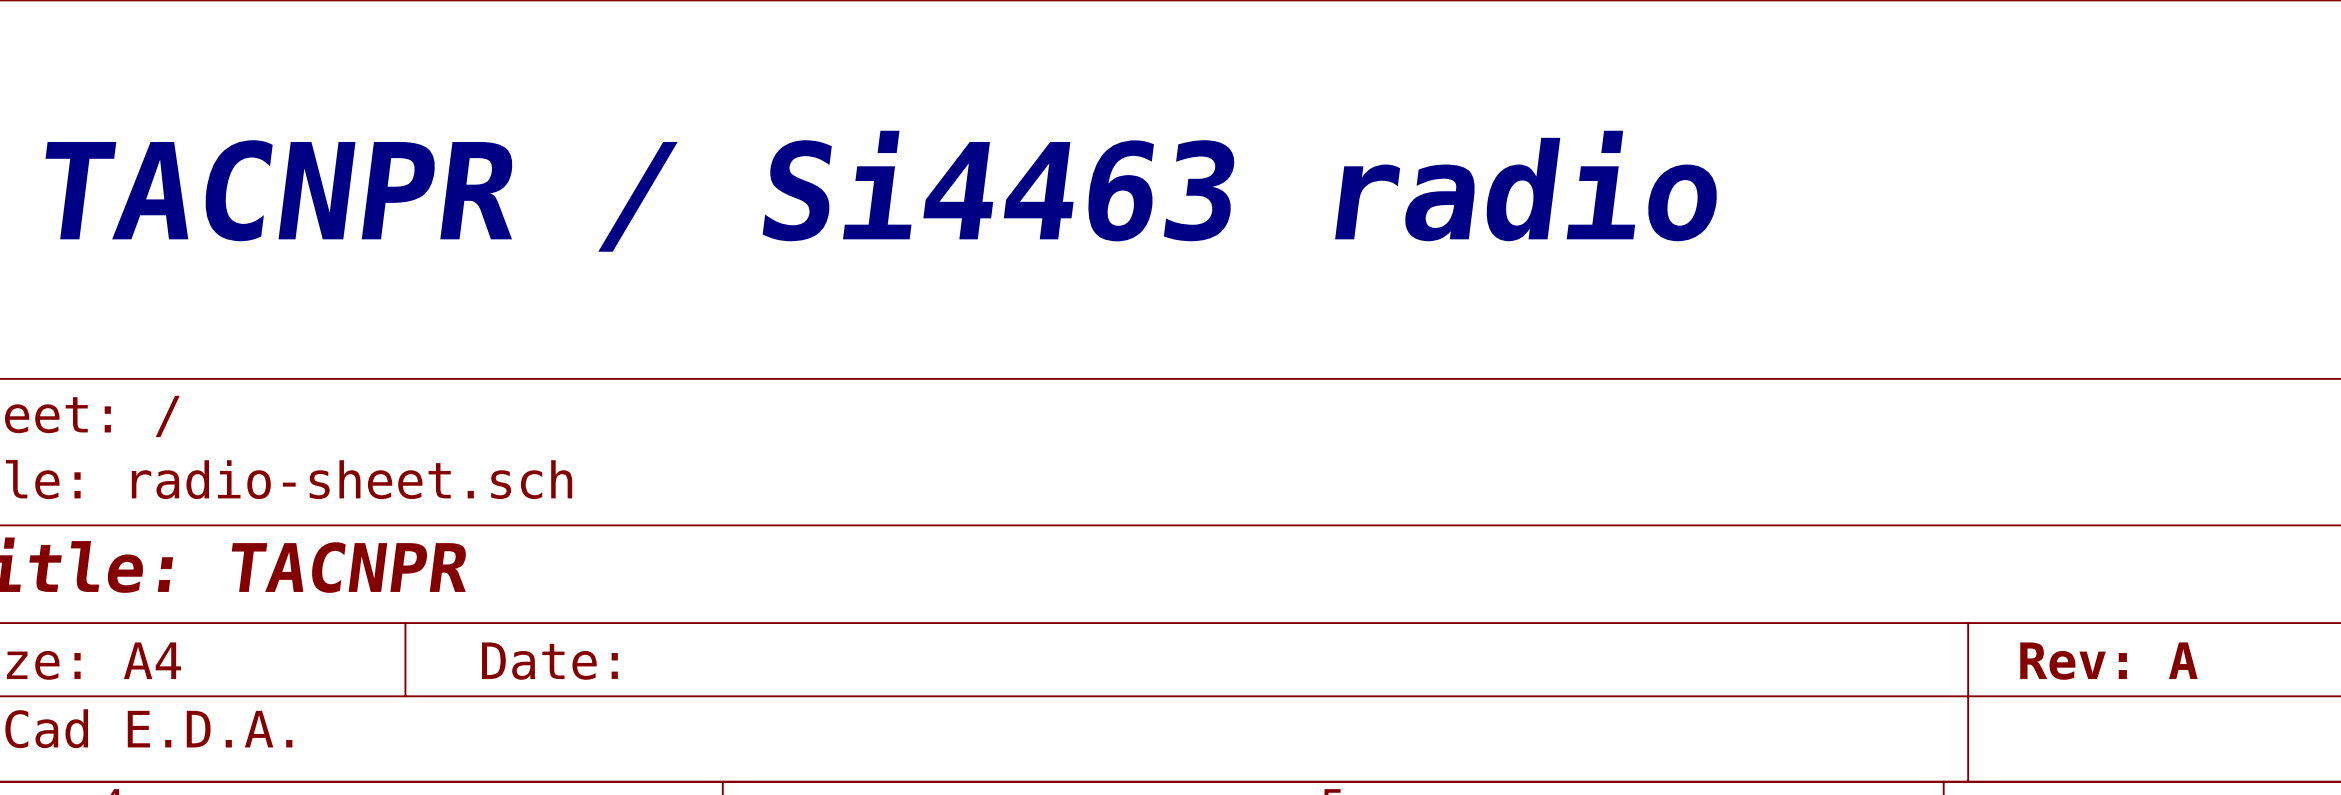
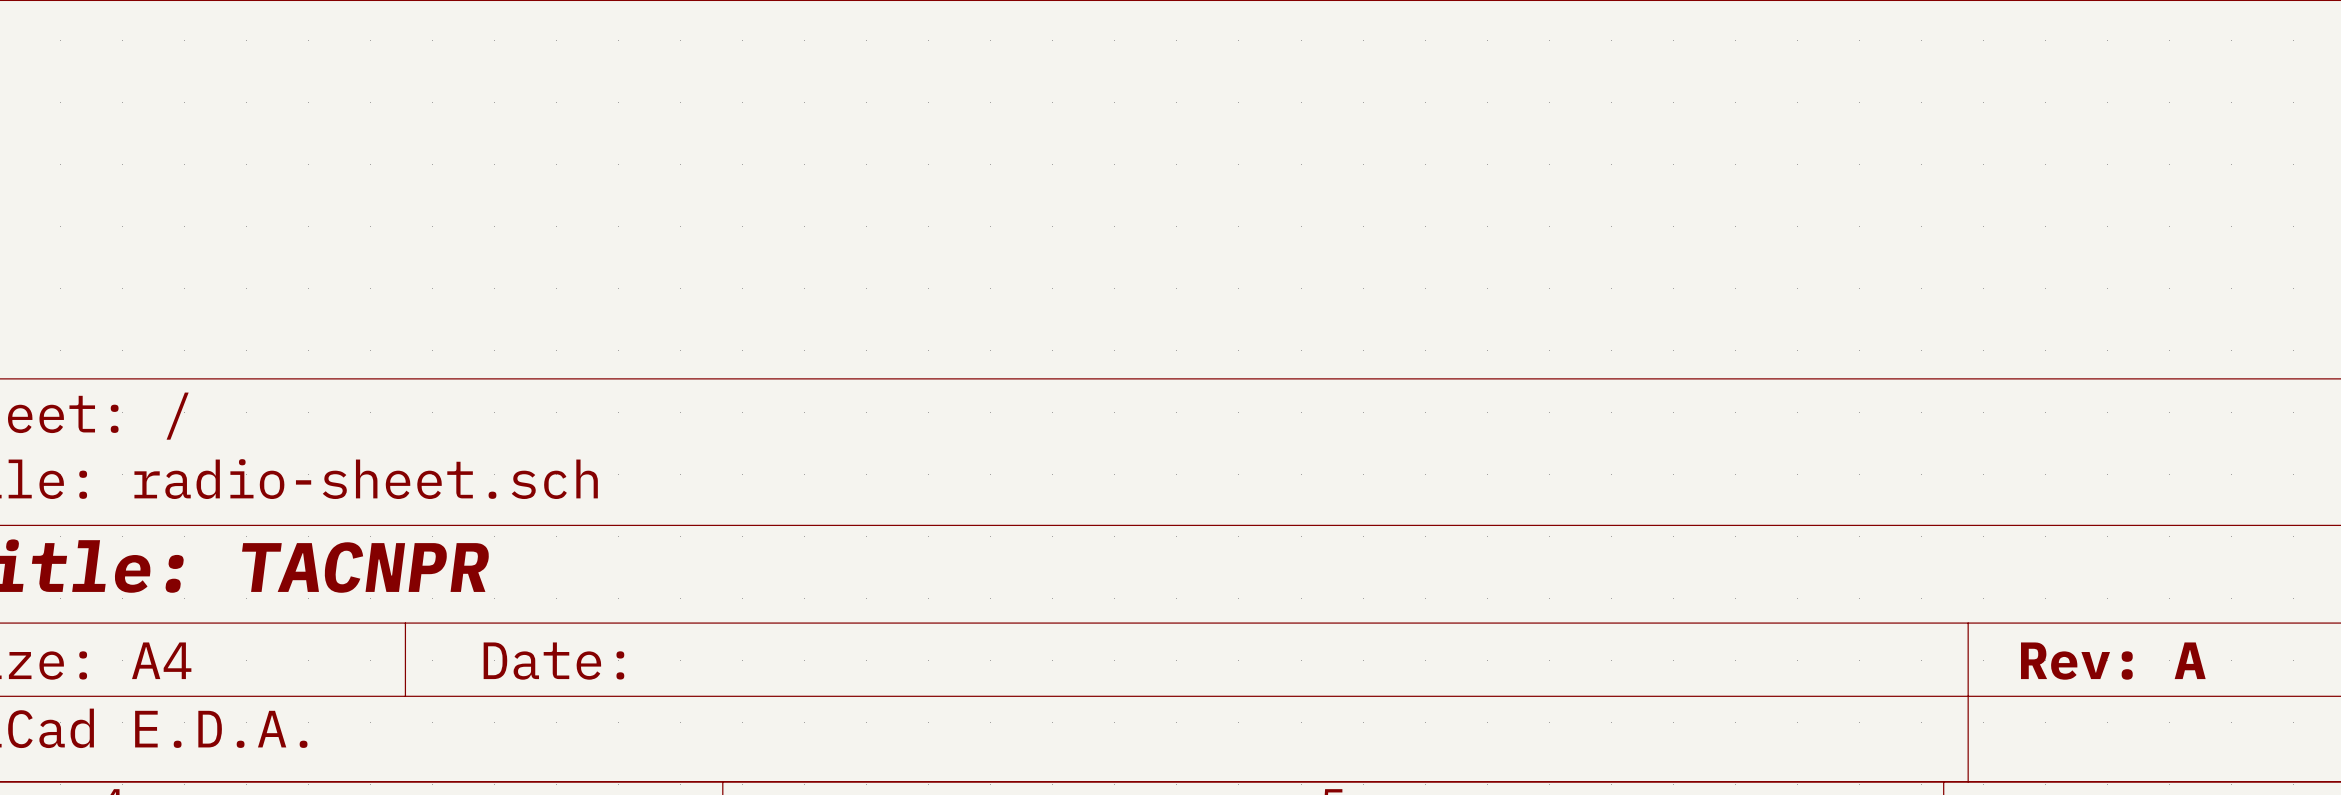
text: TACNPR / Si4463 radio (882, 191) -> none

